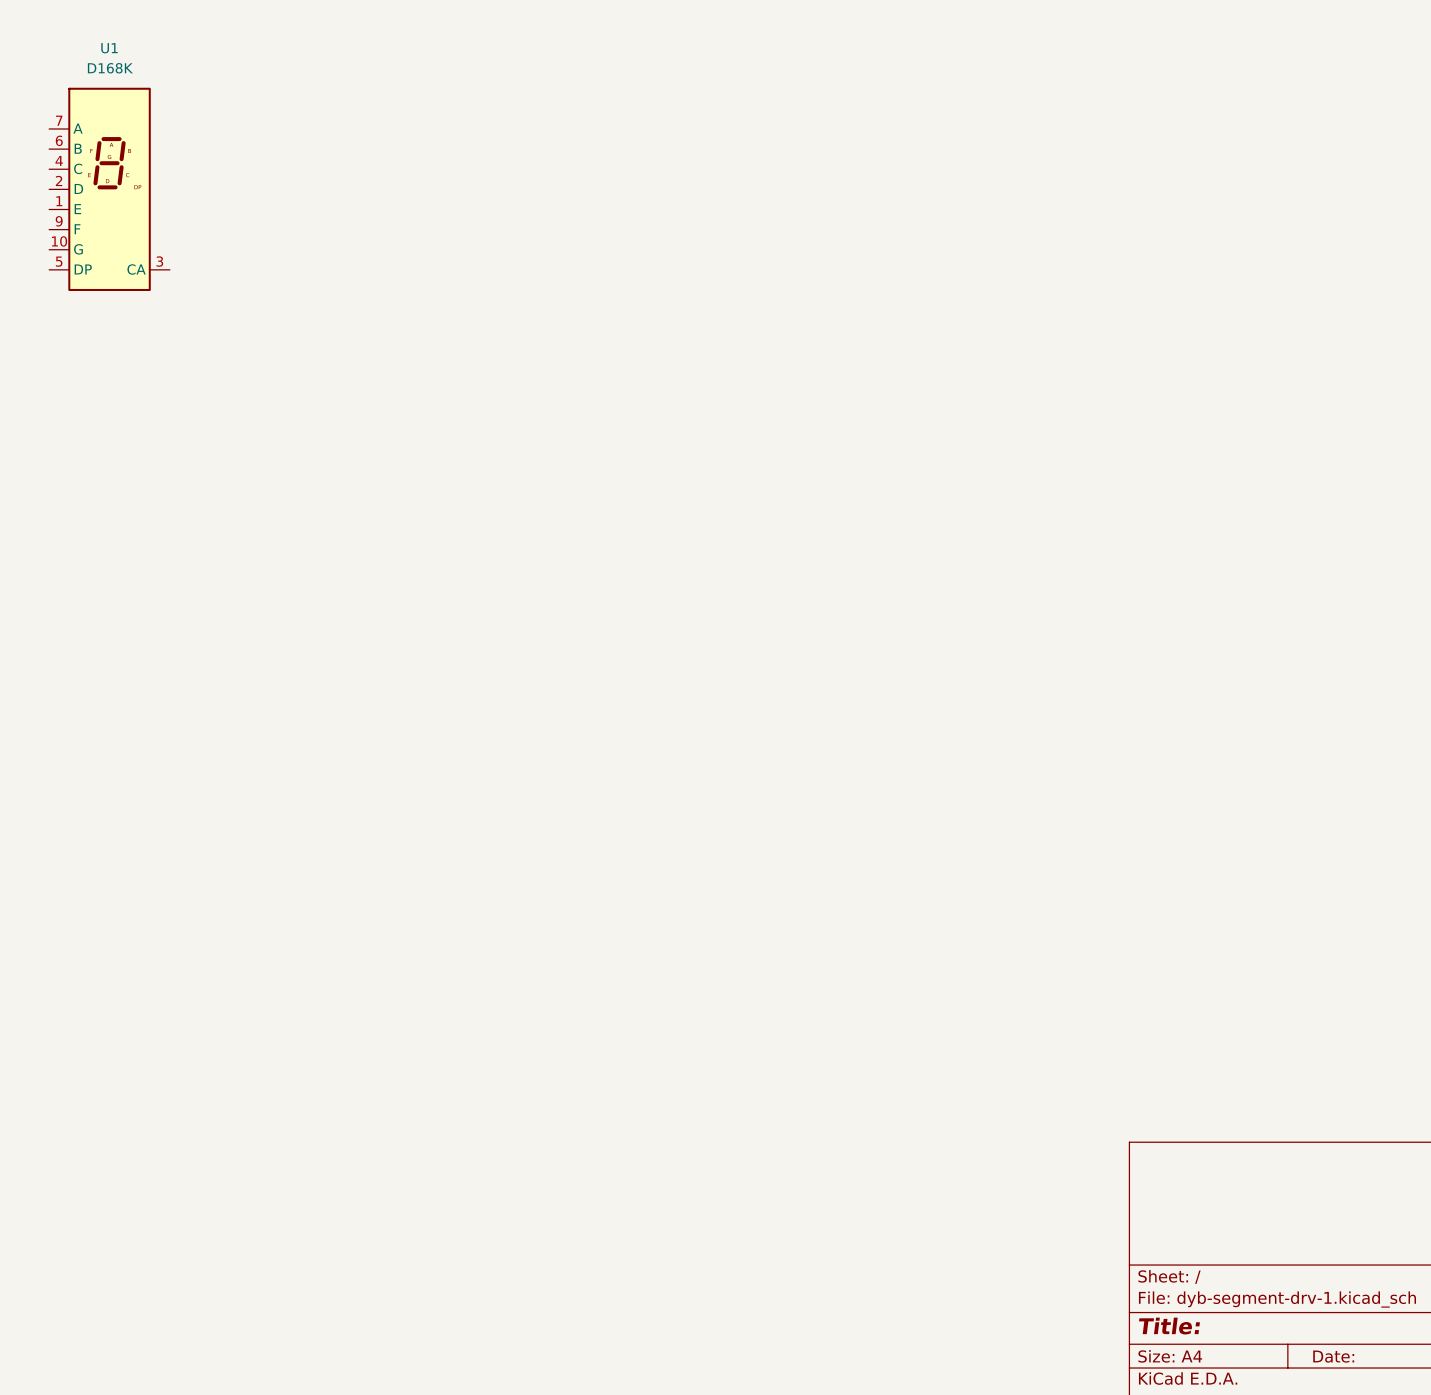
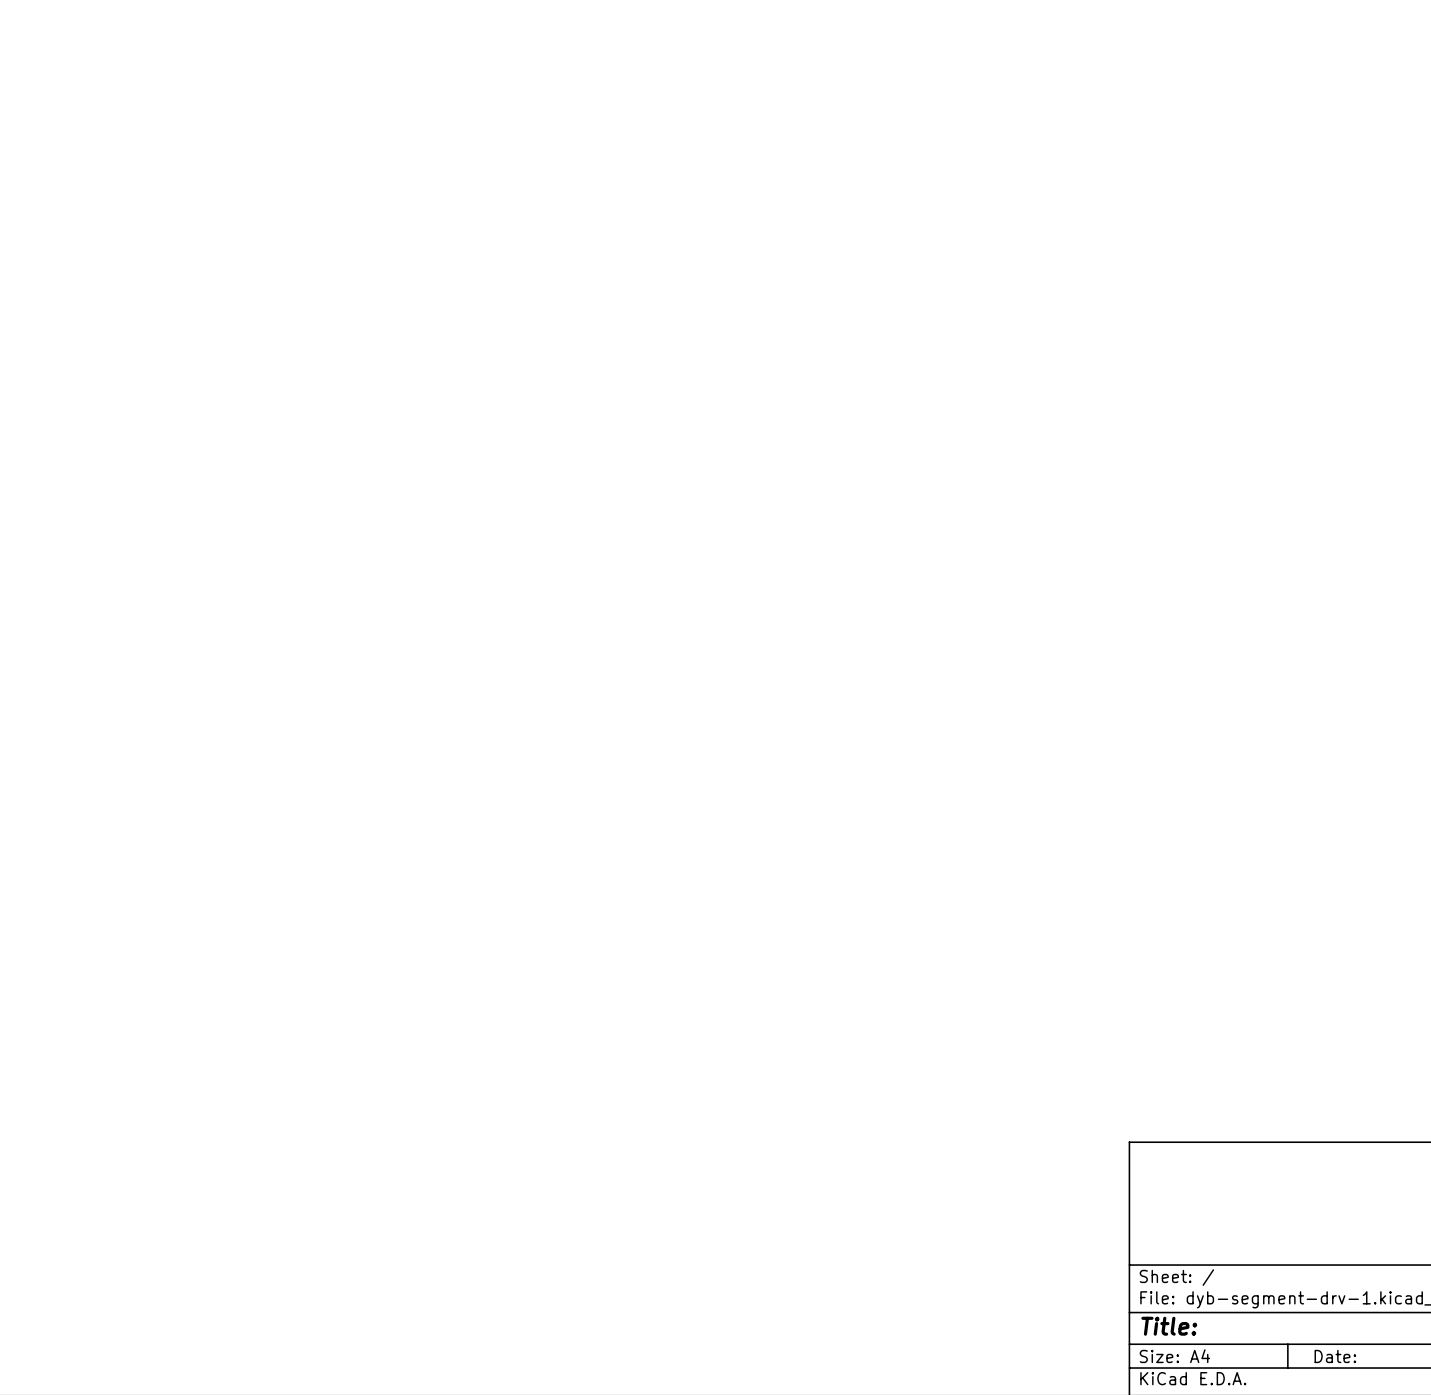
U1: D168K (109, 189) -> none

